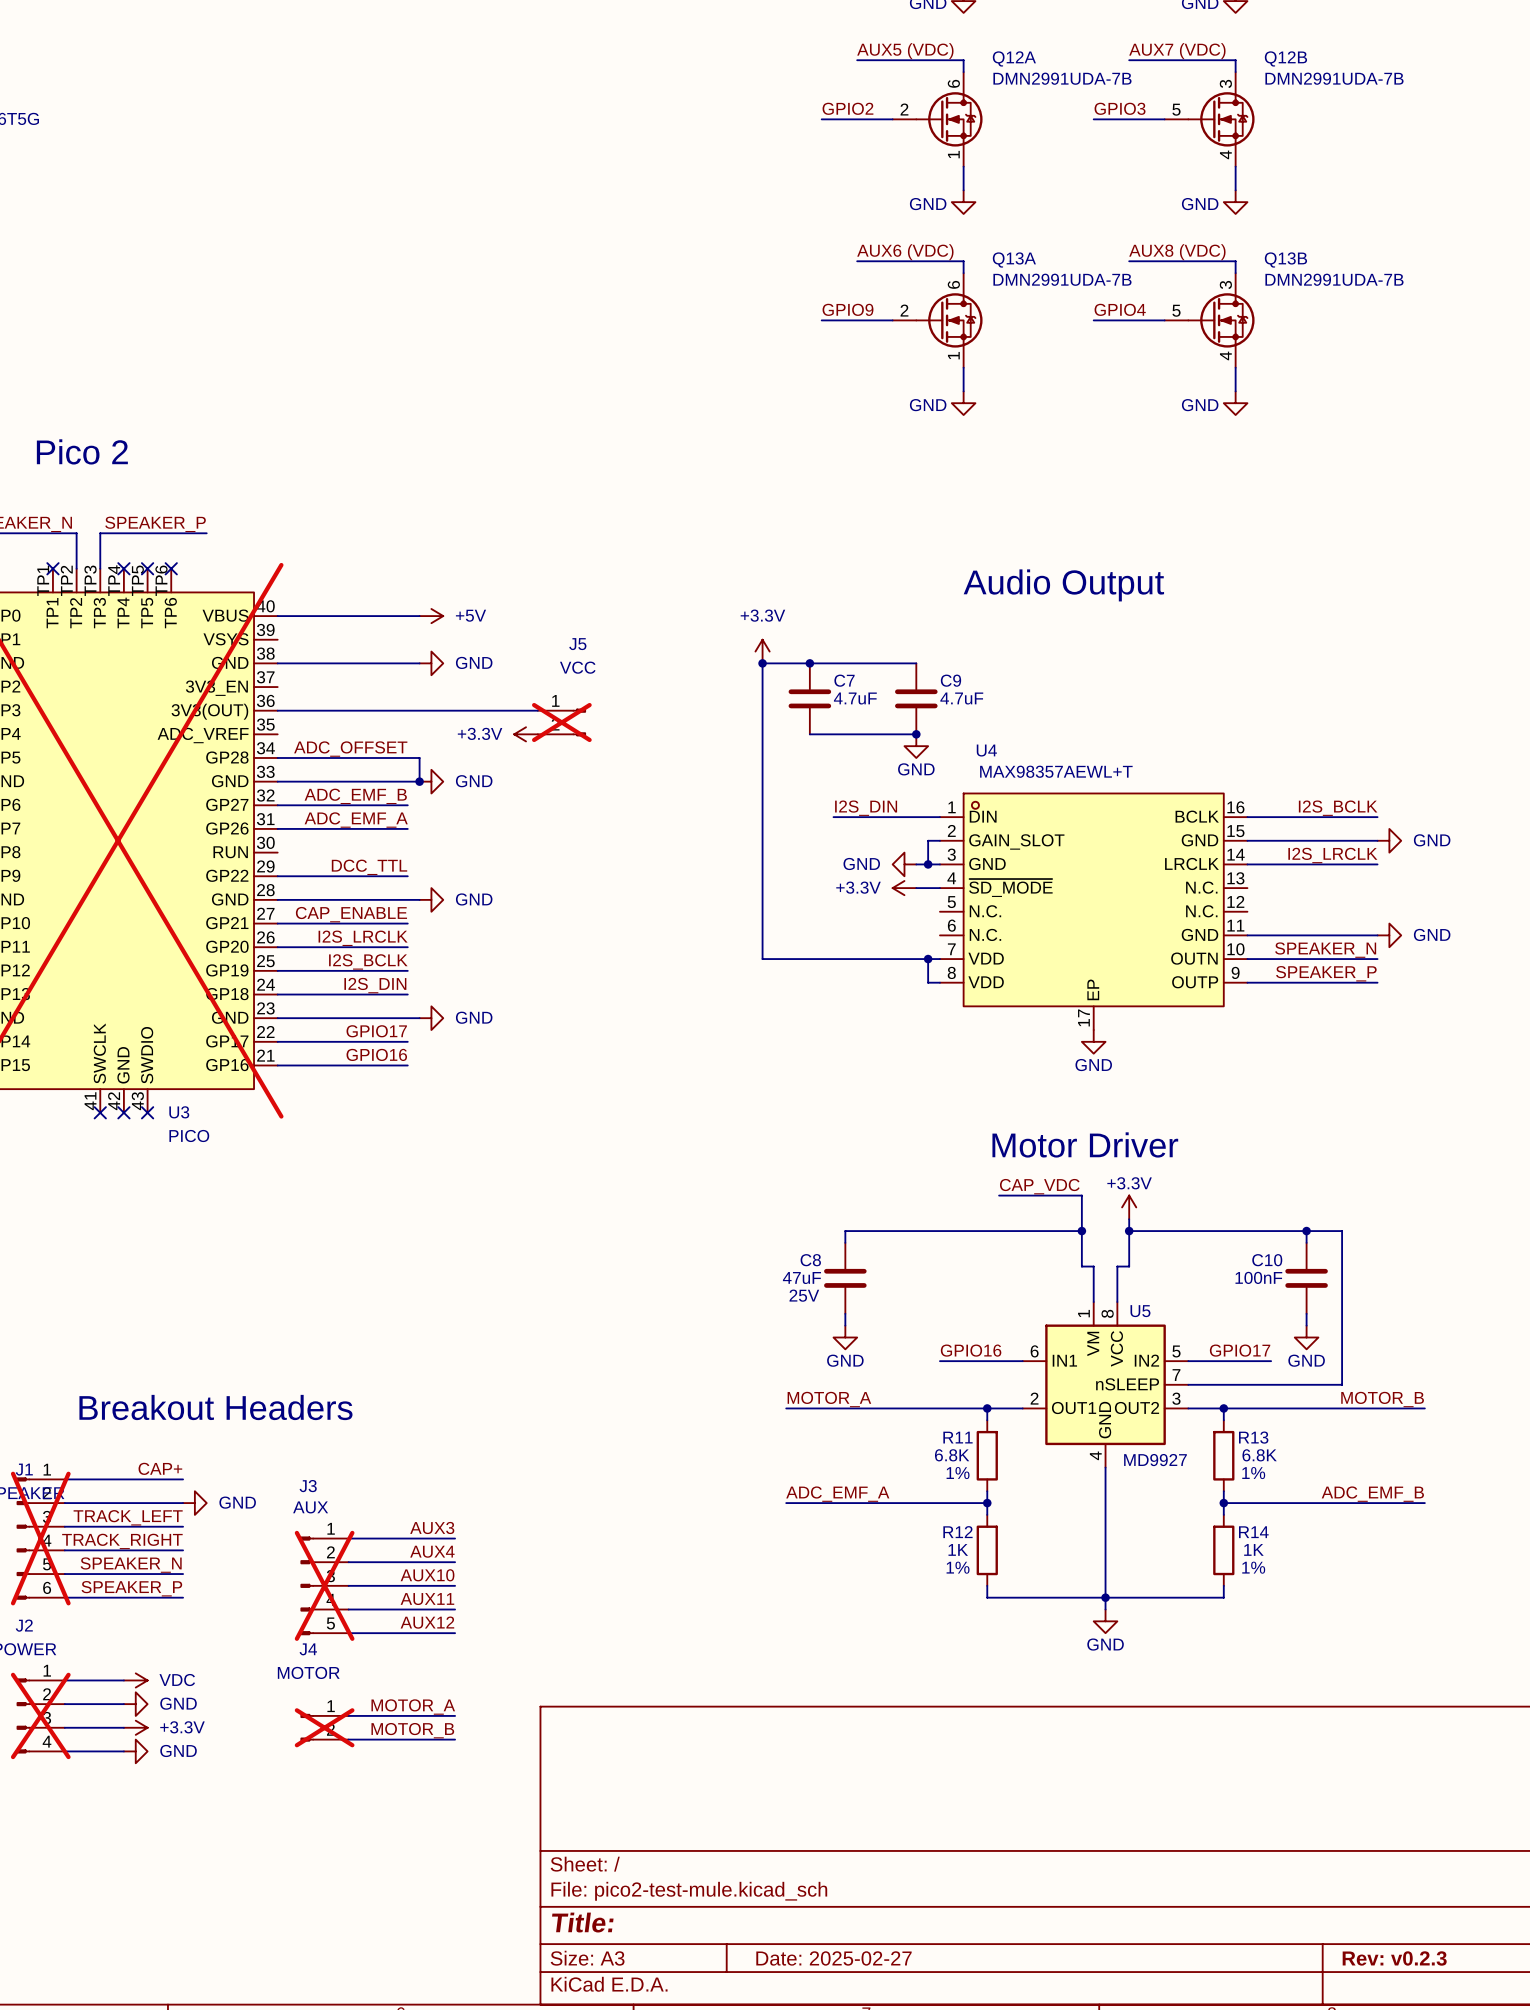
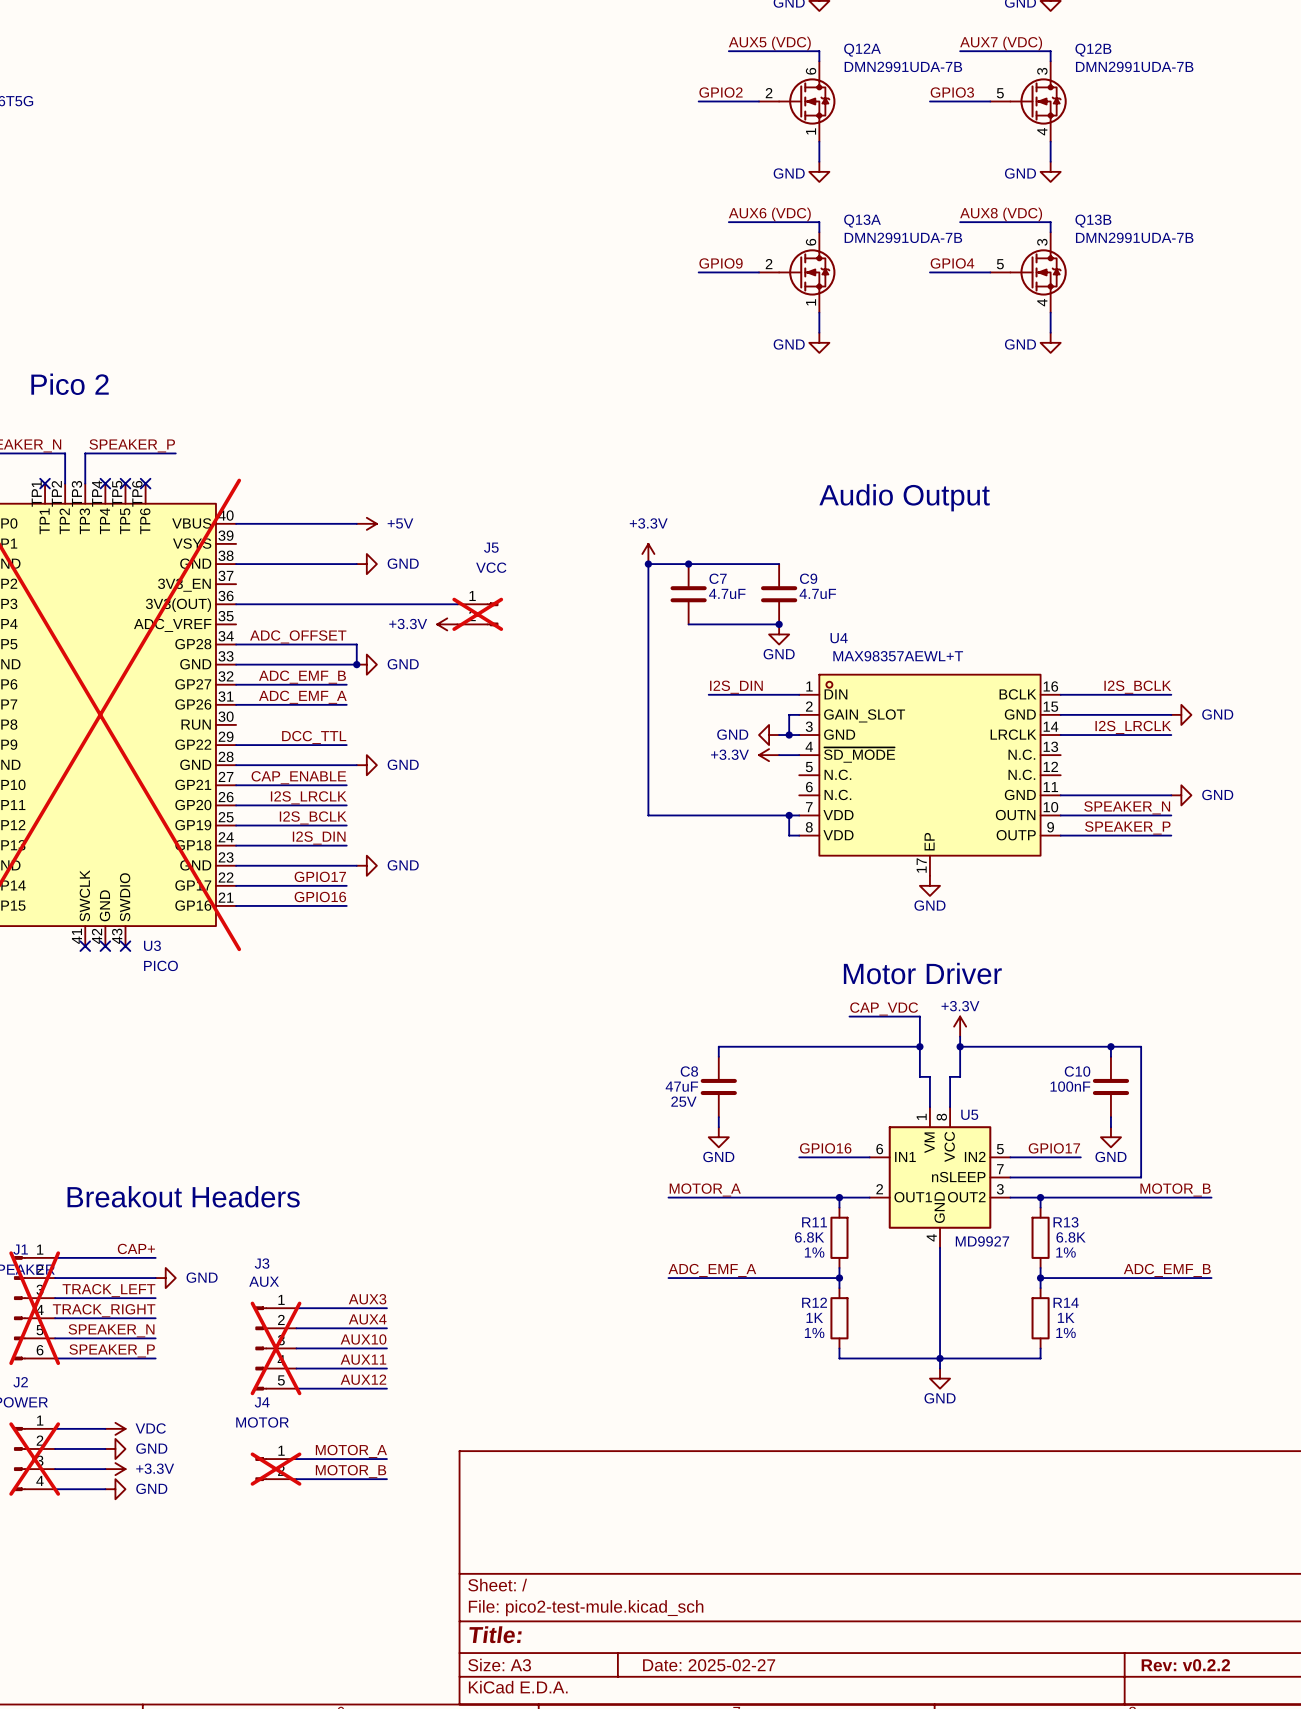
title block: Rev: v0.2.3 (1394, 1958) -> Rev: v0.2.2 (1185, 1665)

